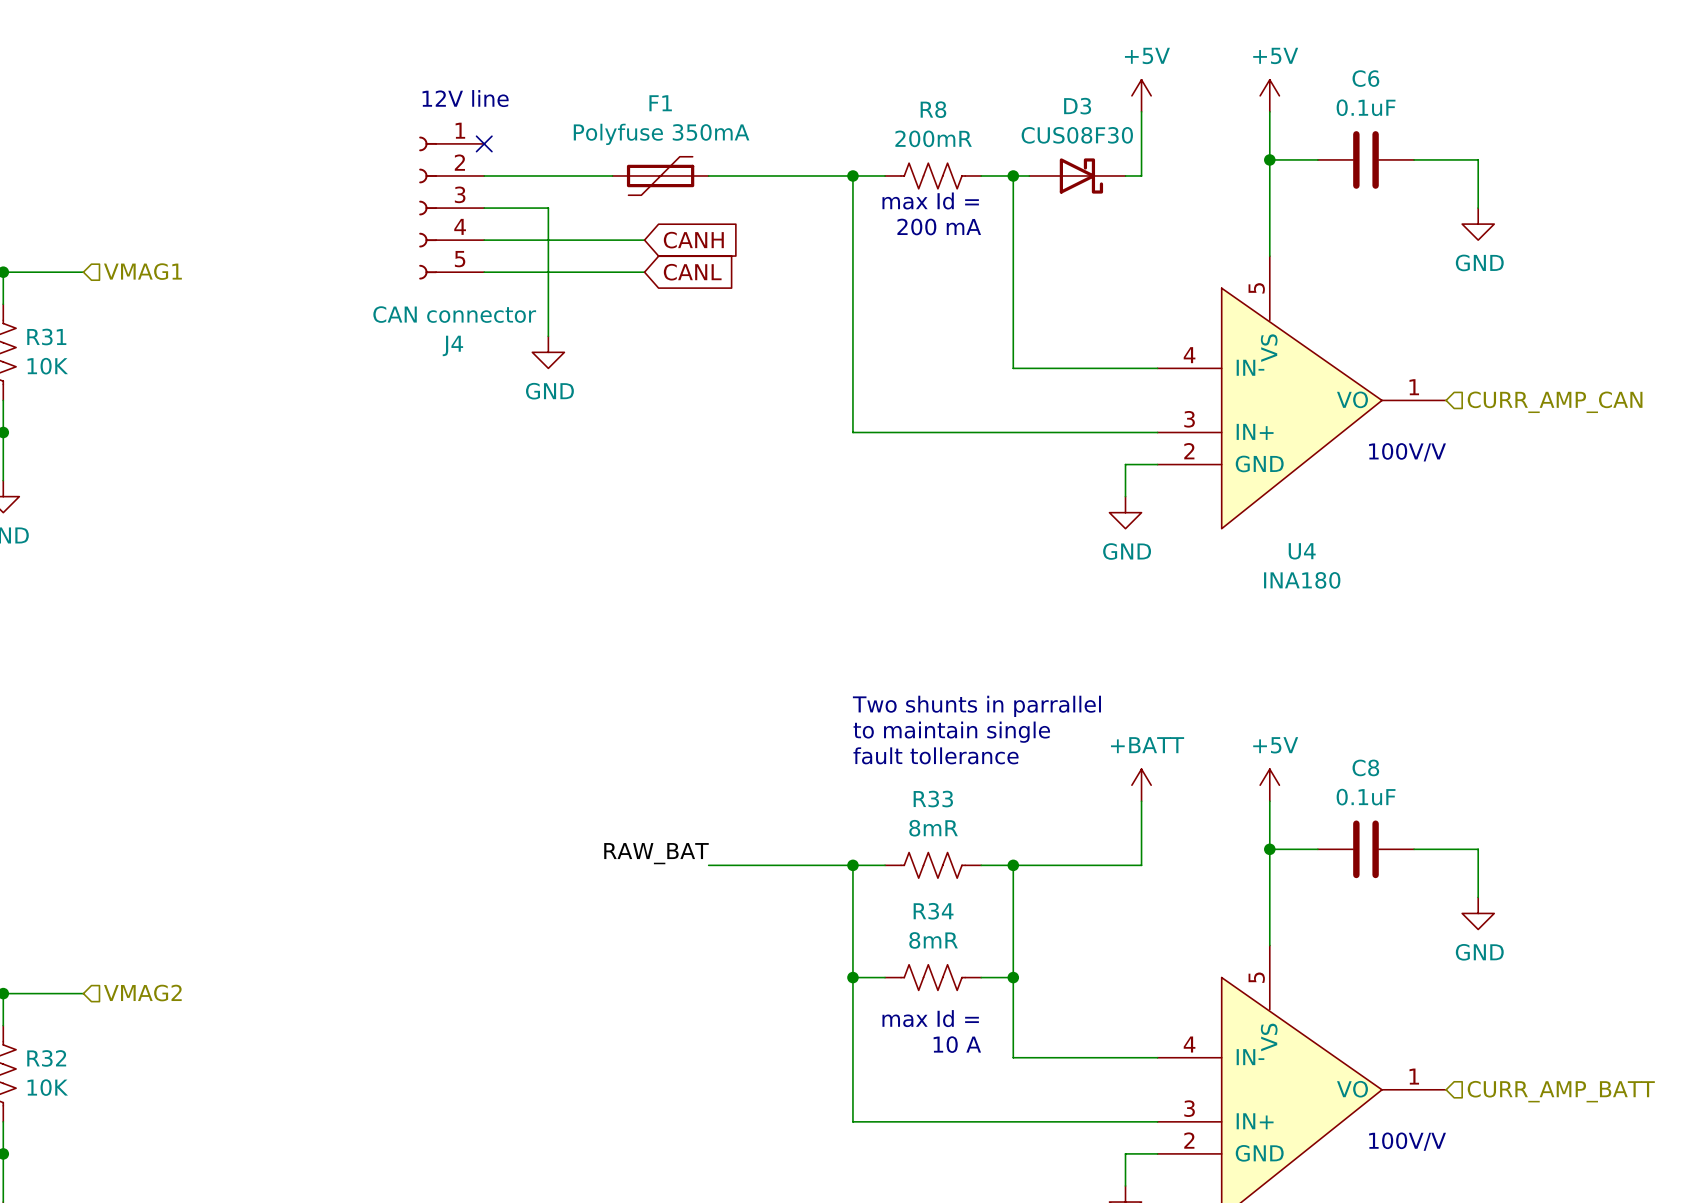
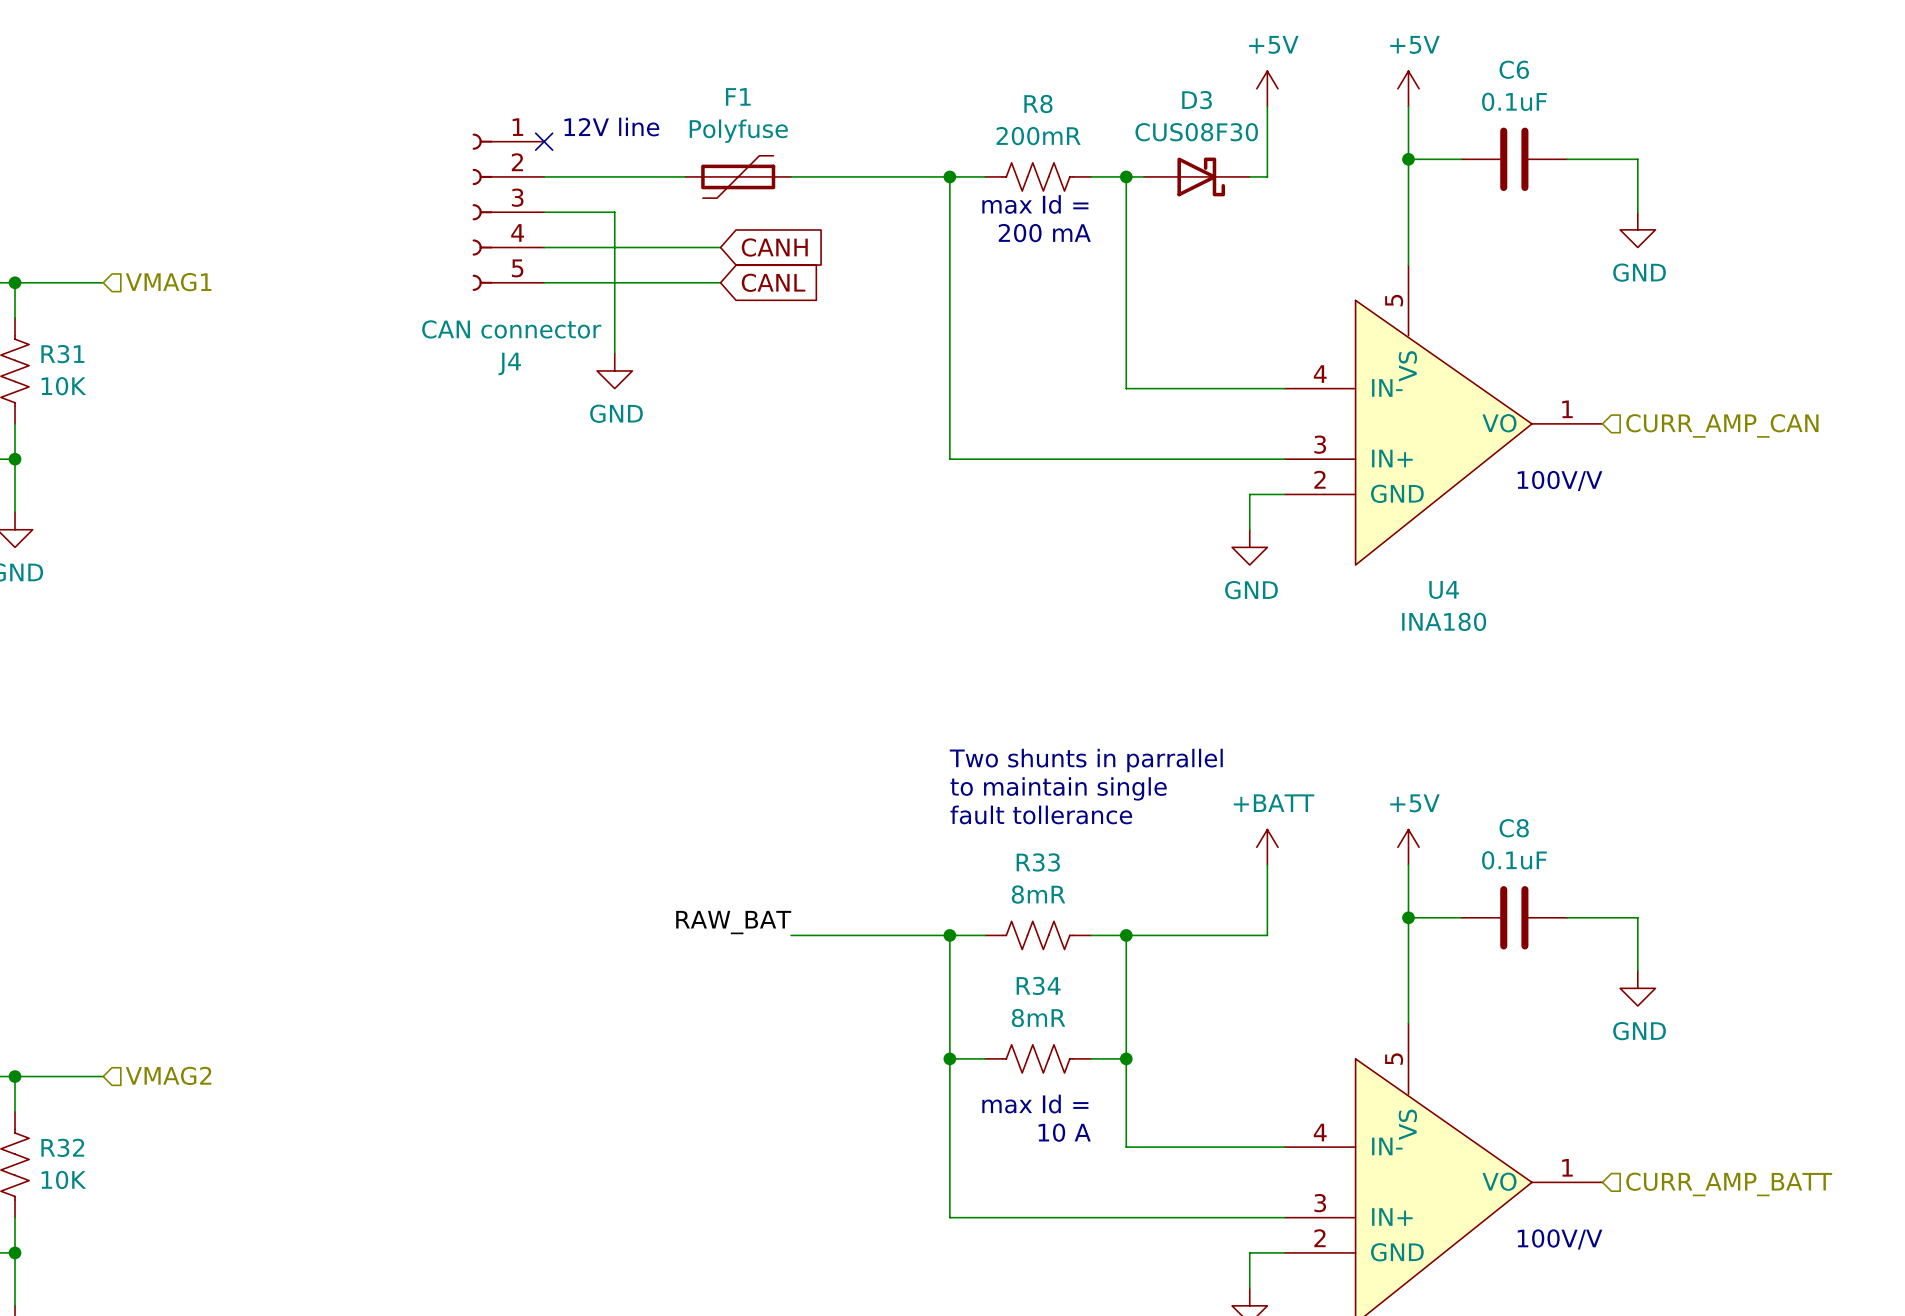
text position: 12V line (465, 98) -> 12V line (611, 127)
F1 value: Polyfuse 350mA (661, 134) -> Polyfuse (738, 131)

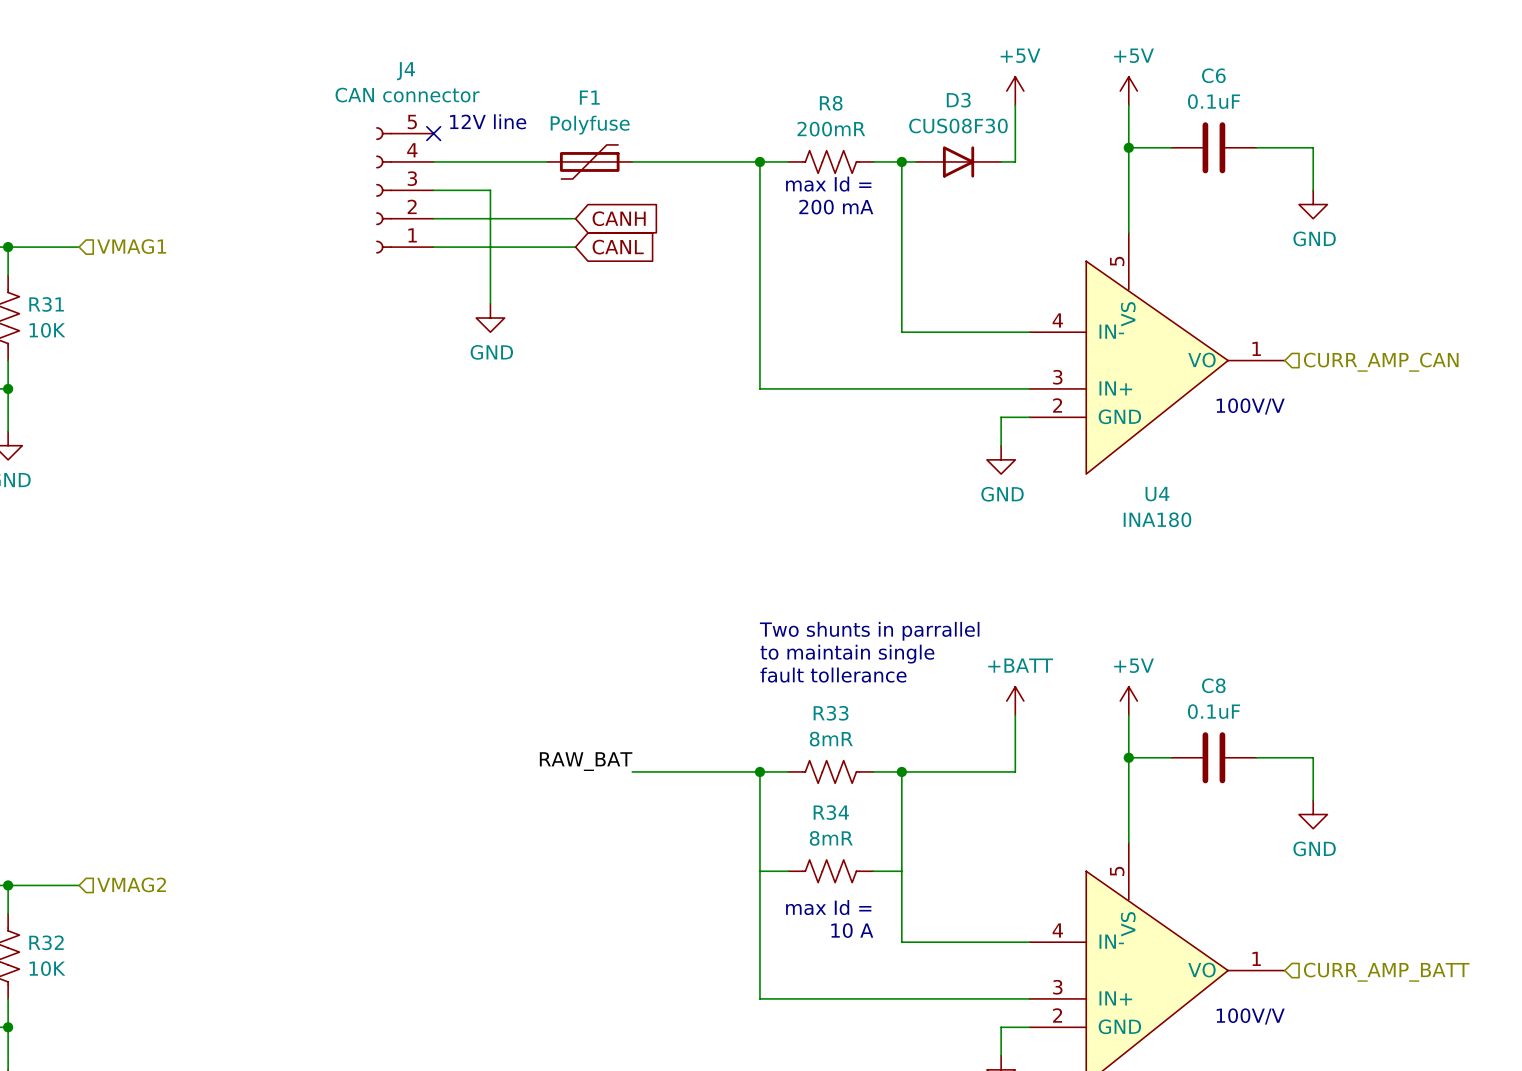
D3 symbol: [1143, 157, 1250, 197] -> [916, 146, 1002, 178]
J4 flip: as is (482, 212) -> up-down (384, 190)
junction: (949, 1058) -> none
junction: (1126, 1058) -> none

